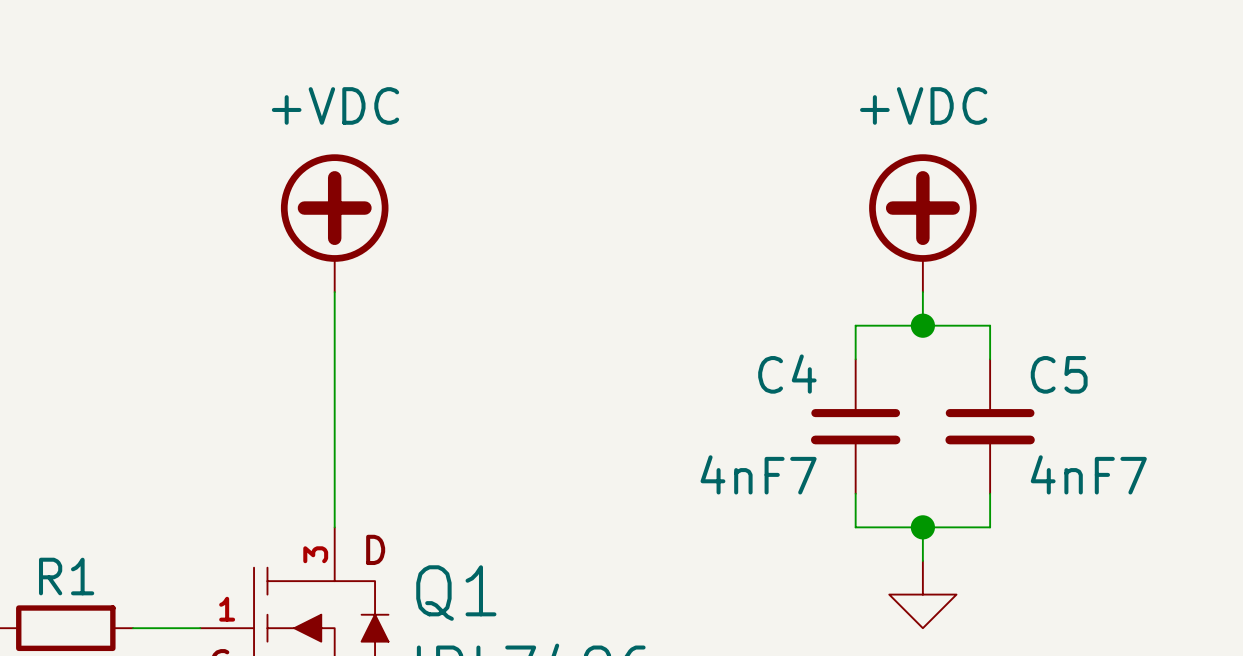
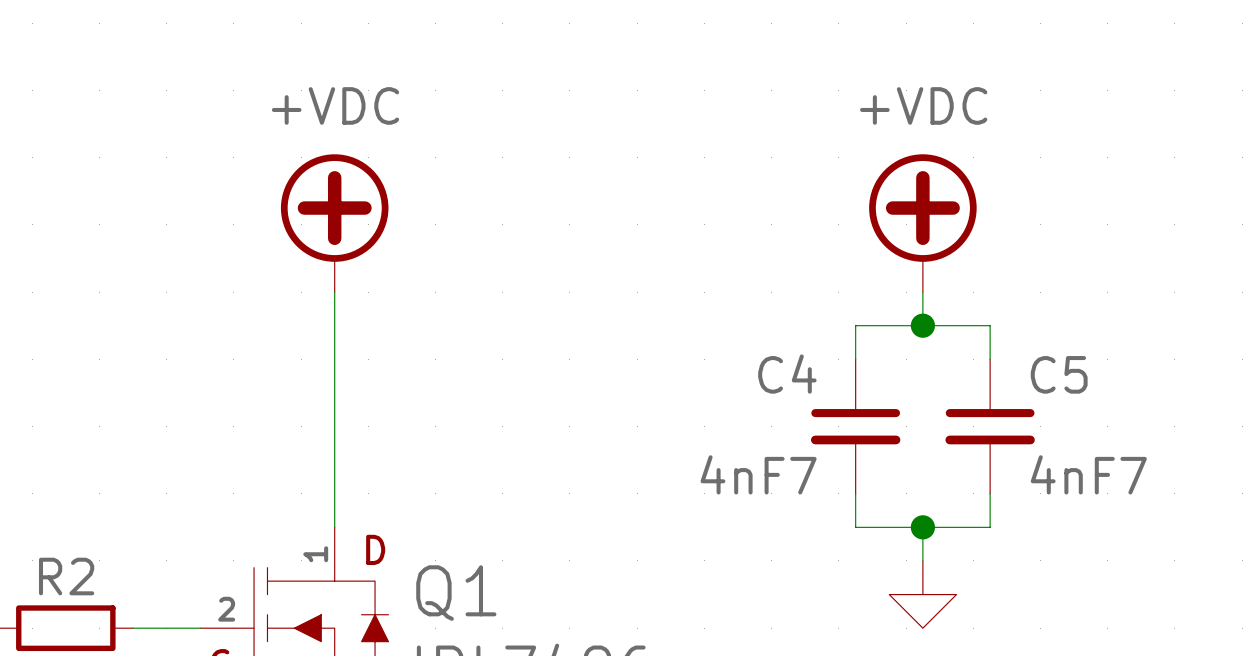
Q1 pin number: 3 (315, 554) -> 1 (315, 554)
R1 name: R1 (66, 576) -> R2 (66, 576)
Q1 pin number: 1 (227, 609) -> 2 (226, 609)

